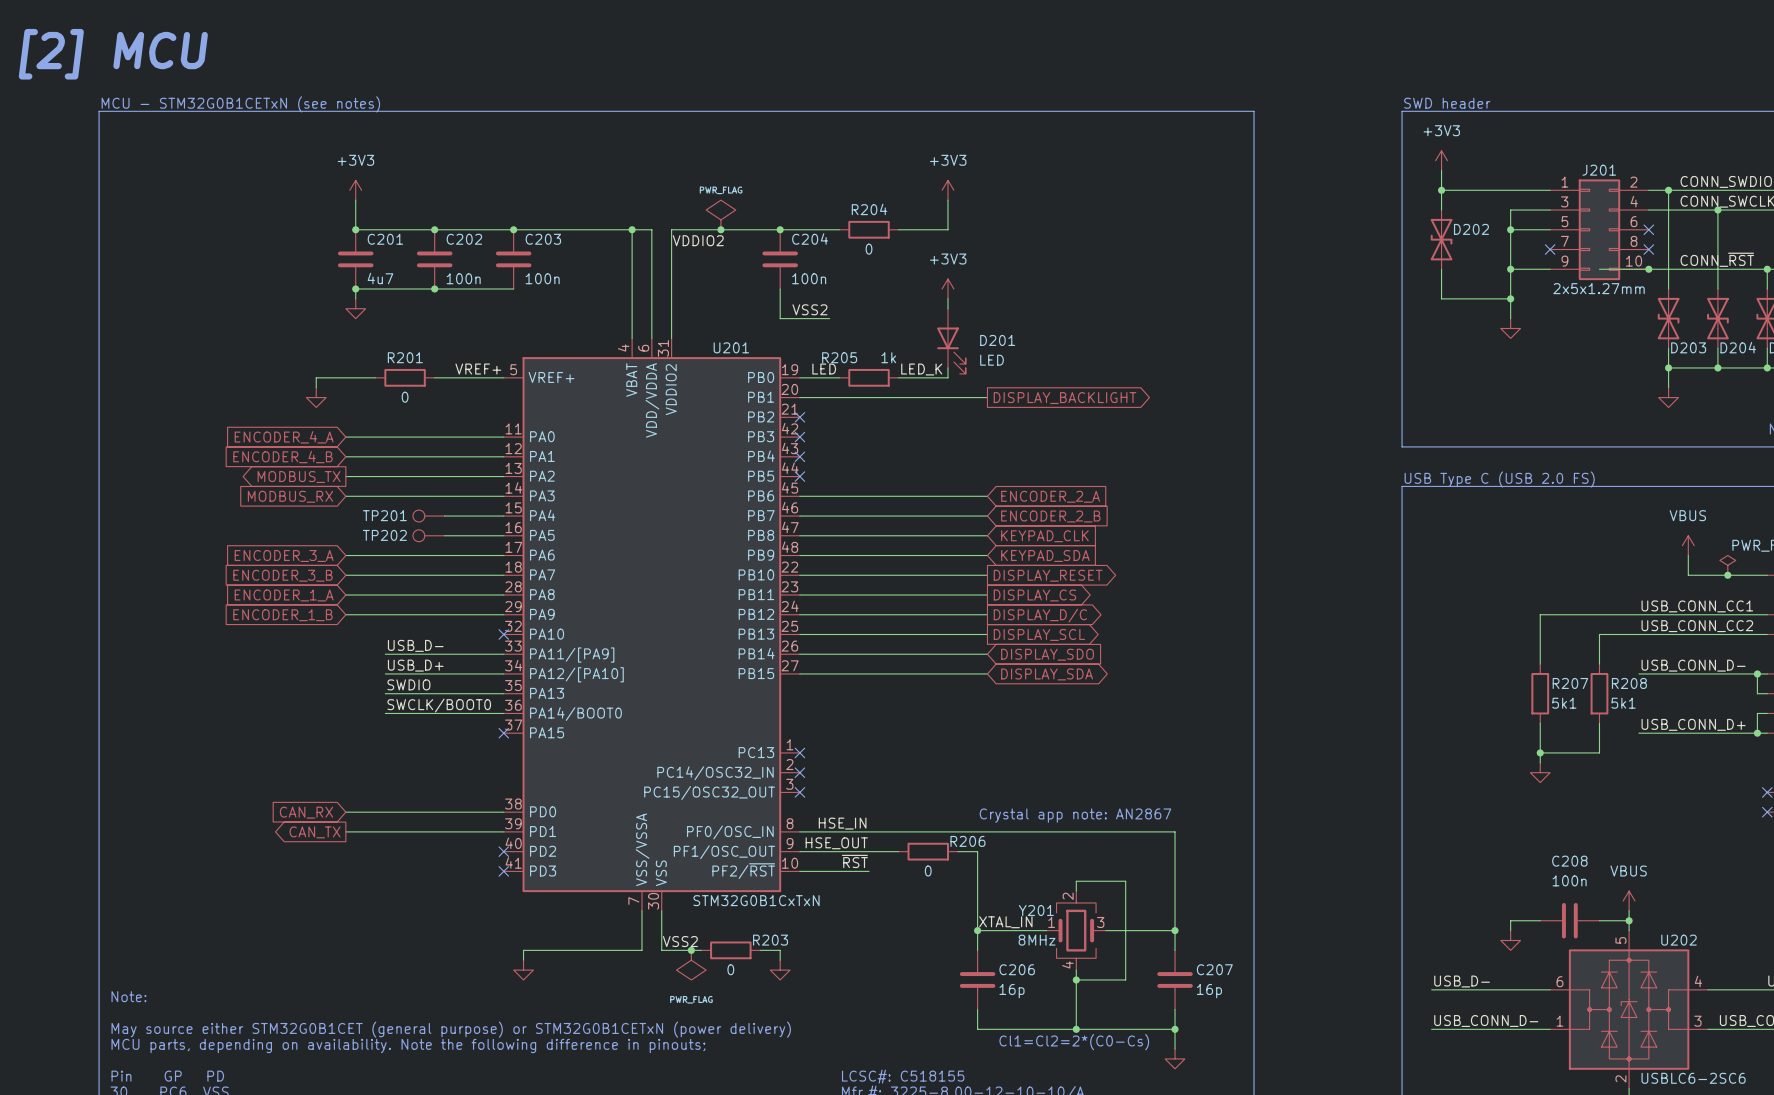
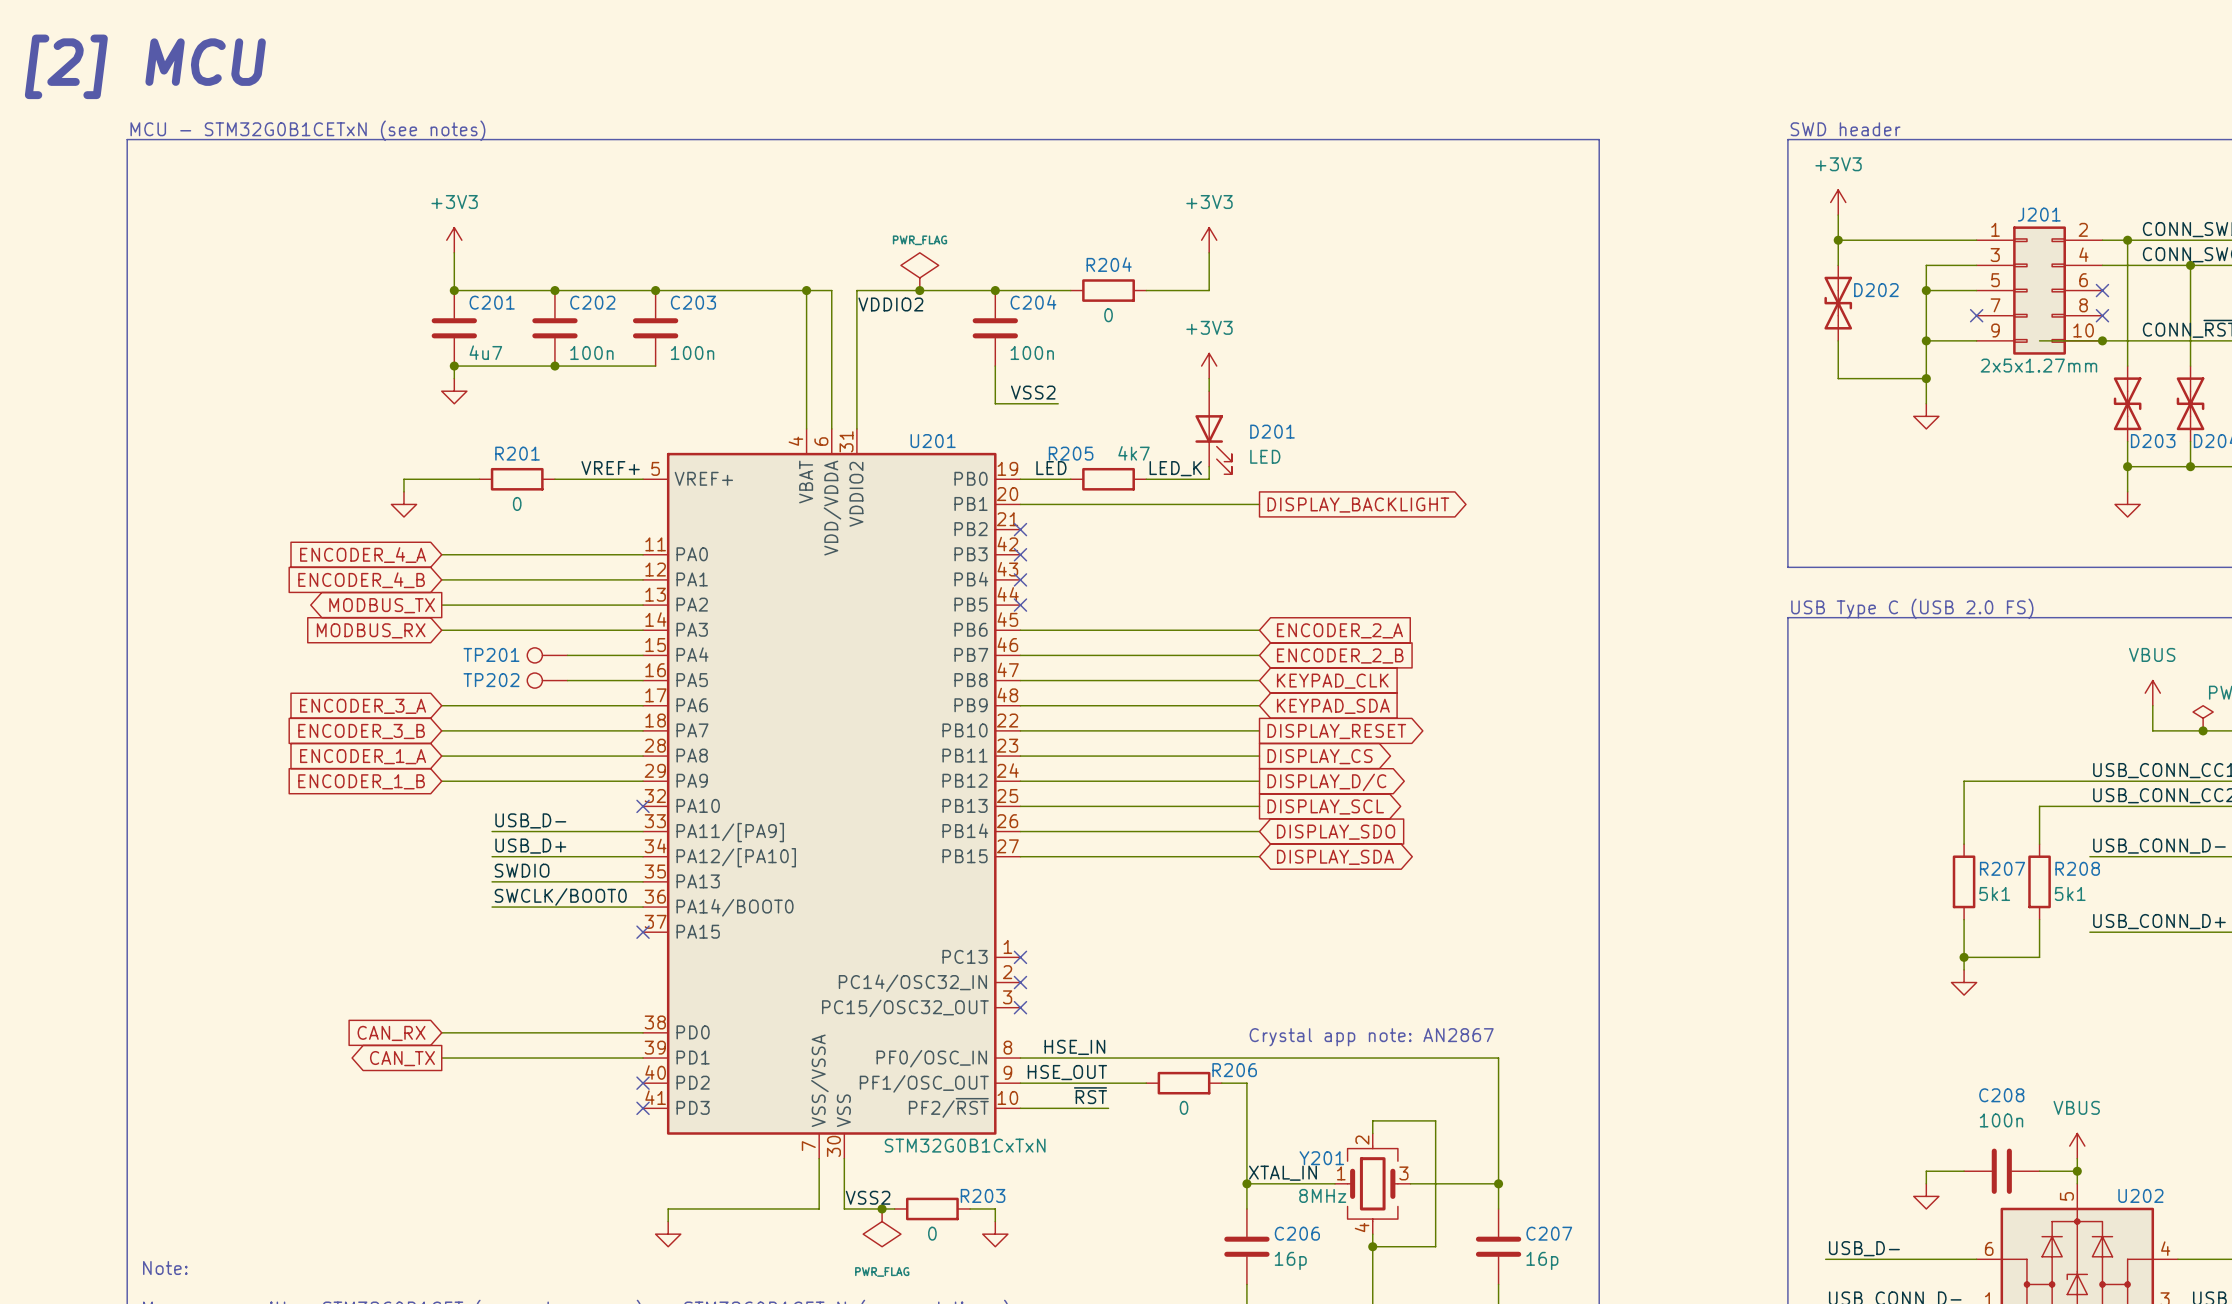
R205 value: 1k (888, 357) -> 4k7 (1134, 453)

